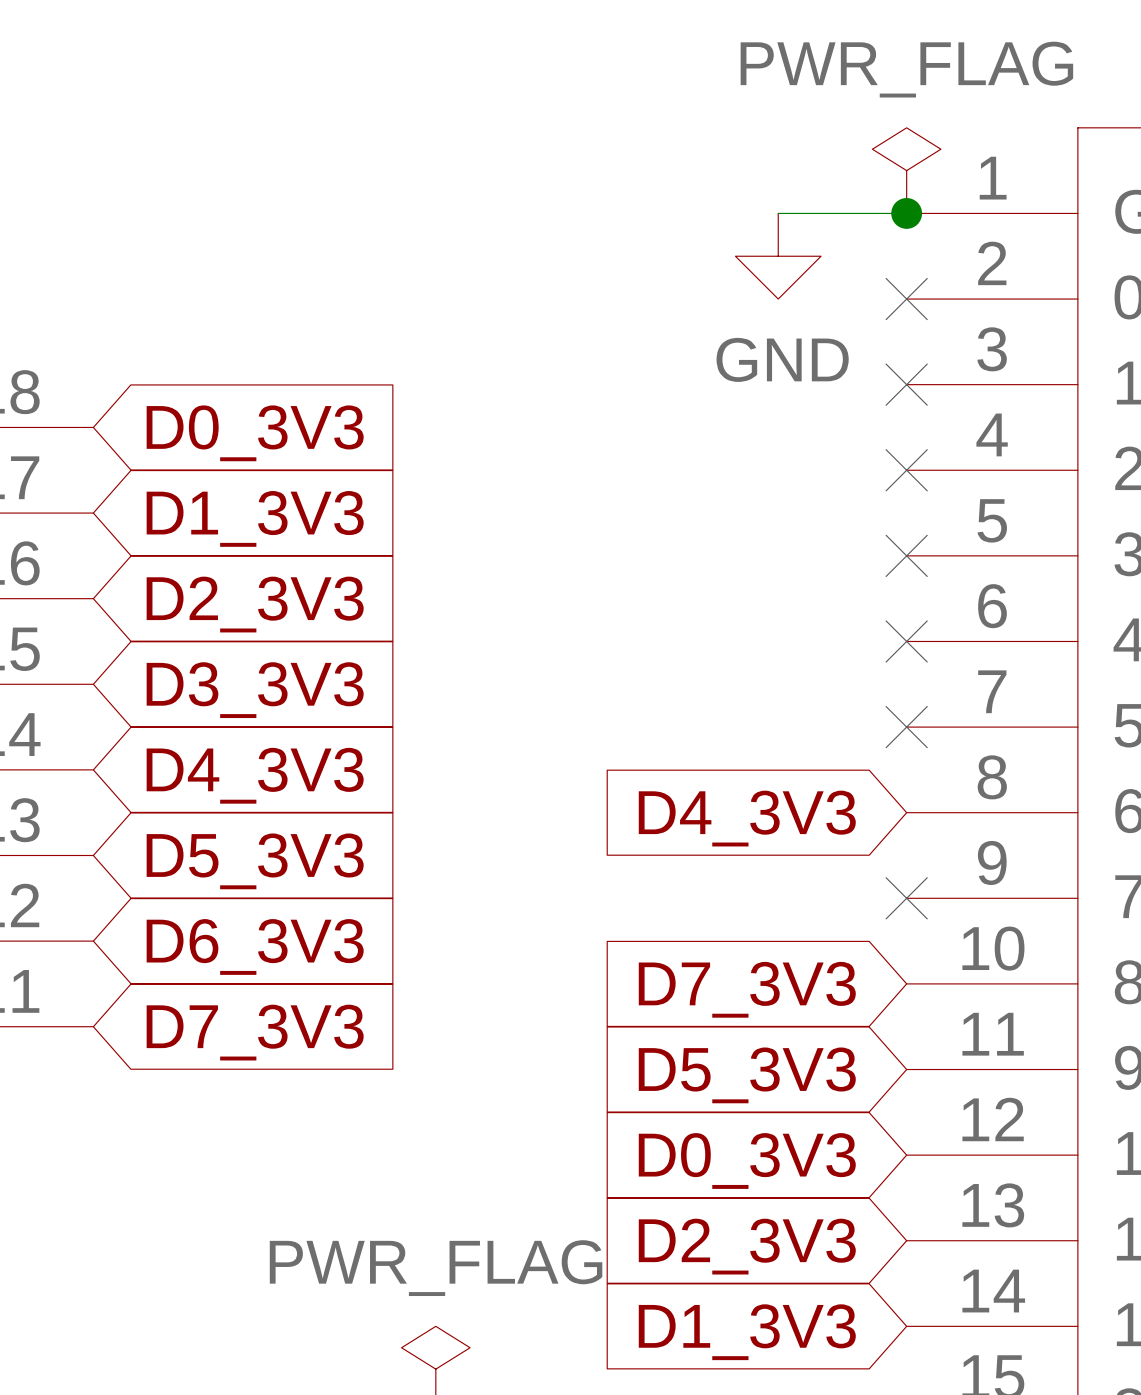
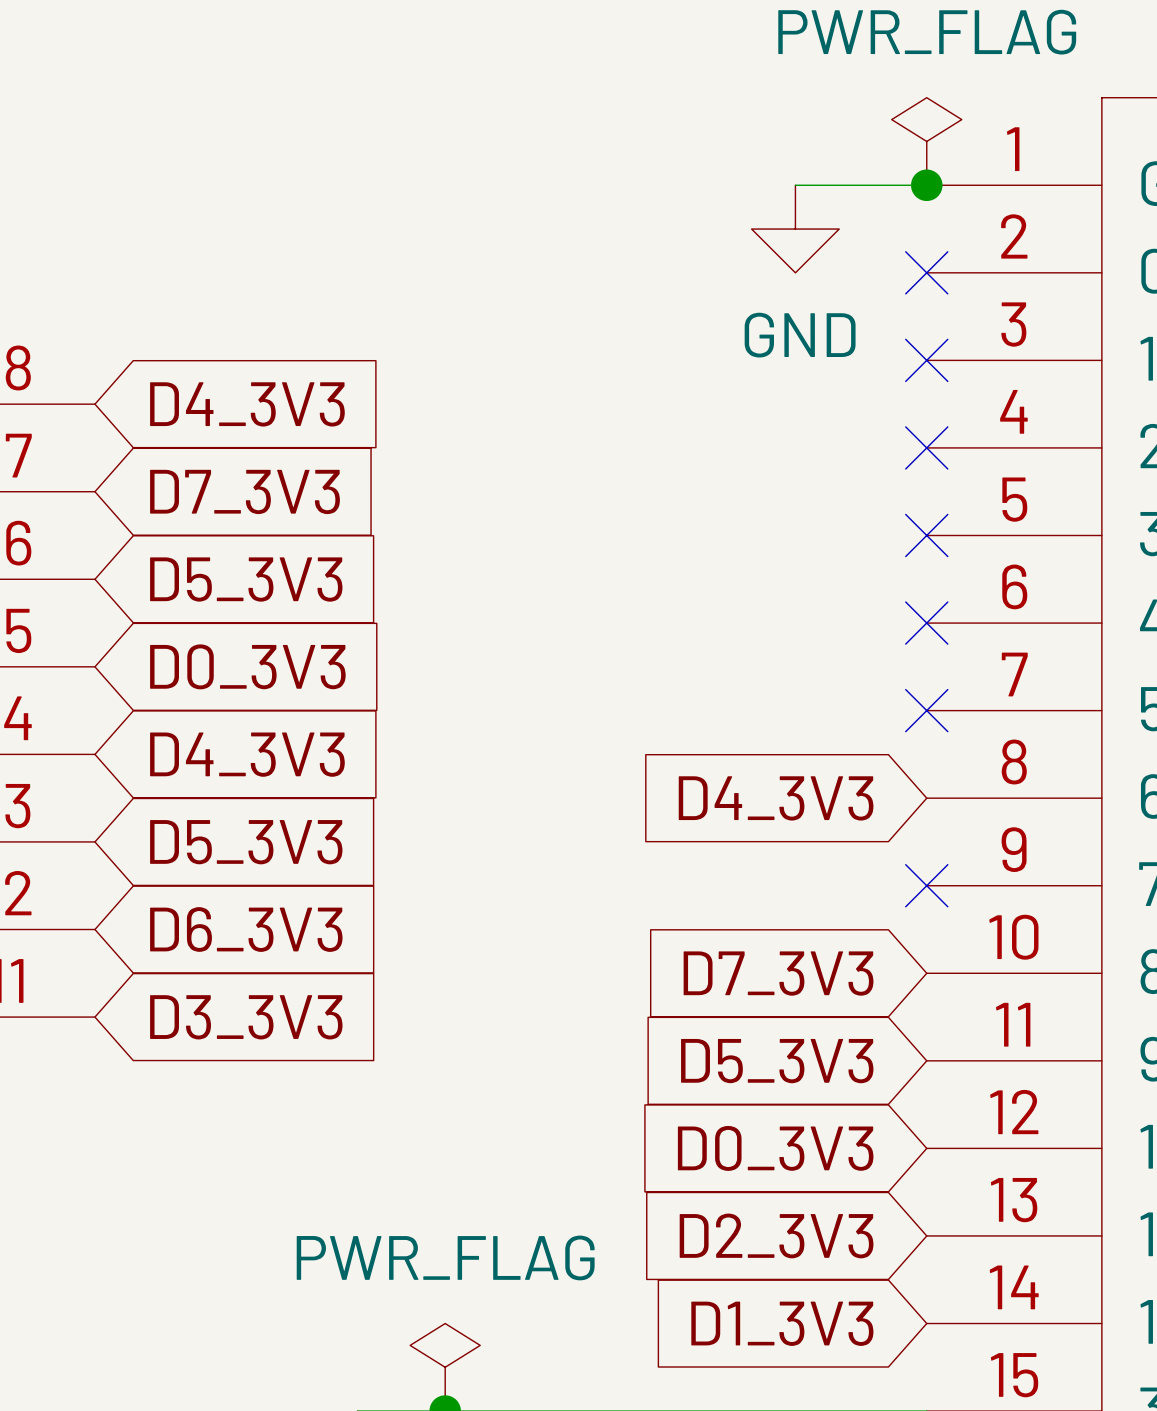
global label: D0_3V3 (255, 433) -> D4_3V3 (247, 404)
global label: D1_3V3 (255, 518) -> D7_3V3 (244, 491)
global label: D2_3V3 (255, 604) -> D5_3V3 (246, 579)
global label: D3_3V3 (255, 690) -> D0_3V3 (247, 666)
global label: D7_3V3 (255, 1032) -> D3_3V3 (246, 1017)

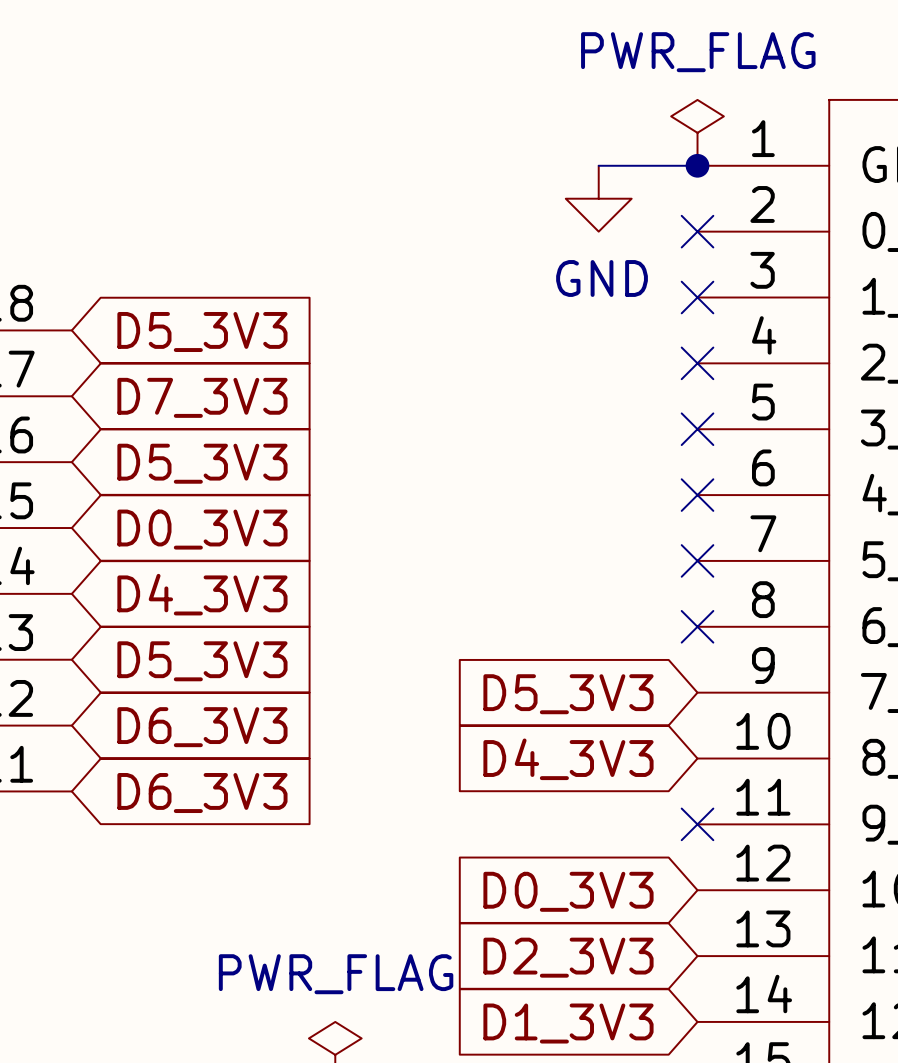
global label: D4_3V3 (247, 404) -> D5_3V3 (202, 332)
global label: D4_3V3 (776, 798) -> none
no-connect mark: none -> (697, 626)
no-connect mark: (926, 885) -> none
global label: D7_3V3 (778, 973) -> D4_3V3 (568, 759)
global label: D3_3V3 (246, 1017) -> D6_3V3 (202, 793)
no-connect mark: none -> (697, 824)
global label position: D5_3V3 (777, 1061) -> D5_3V3 (568, 694)

